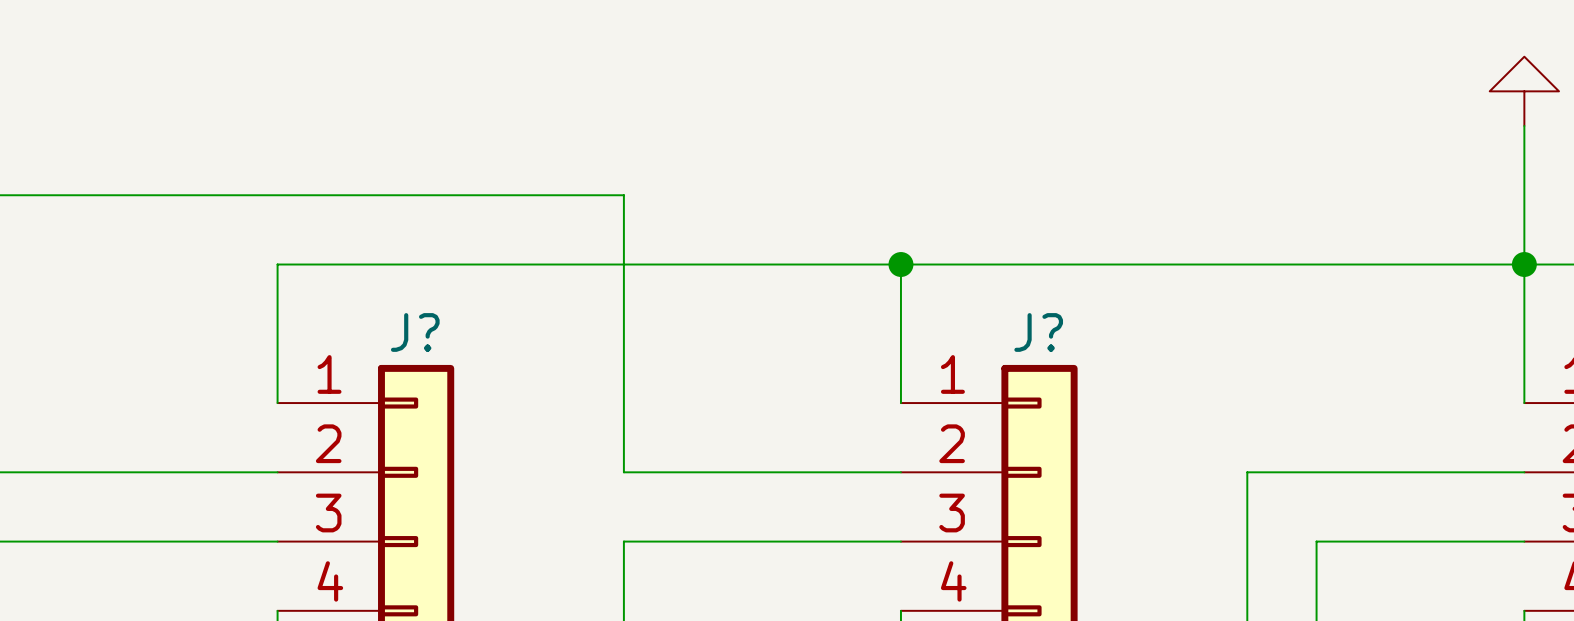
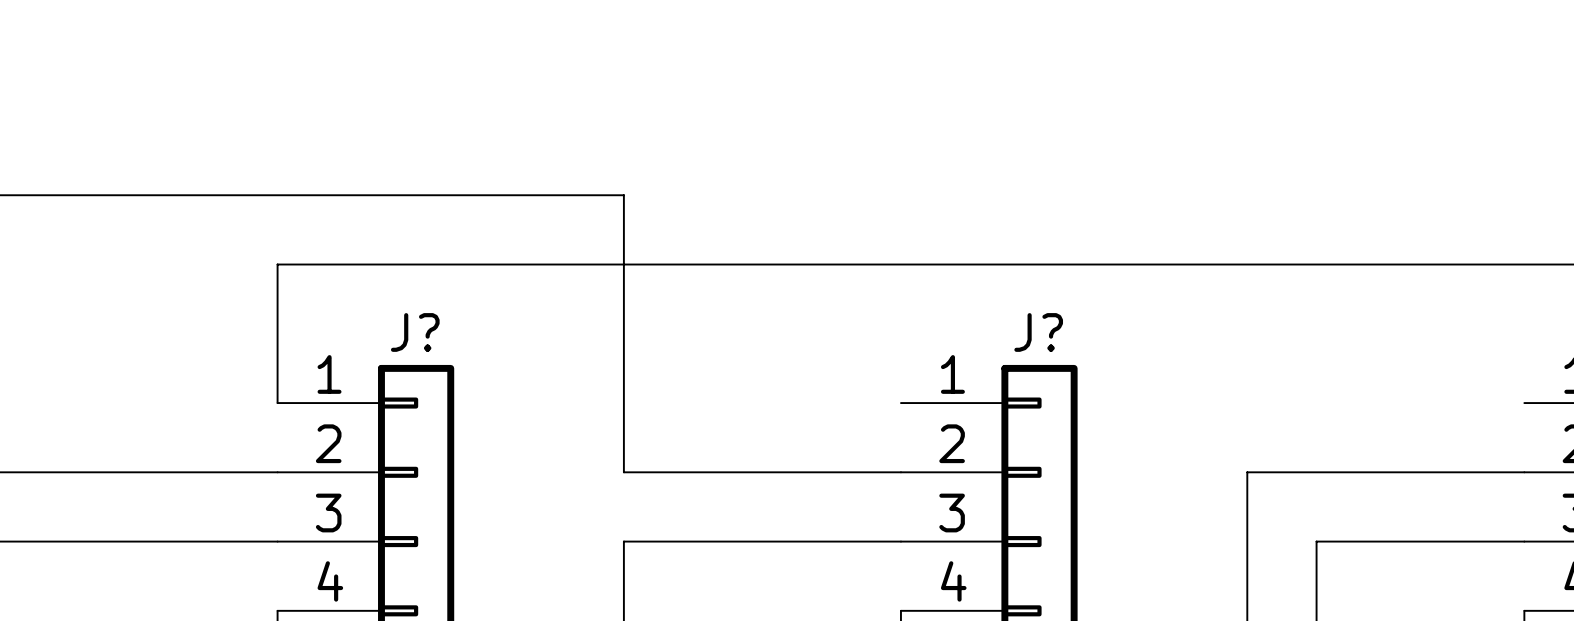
power symbol: (1524, 91) -> none
wire: (1524, 125) (1524, 403) -> none
wire: (900, 264) (900, 403) -> none
junction: (900, 264) -> none
junction: (1524, 264) -> none

